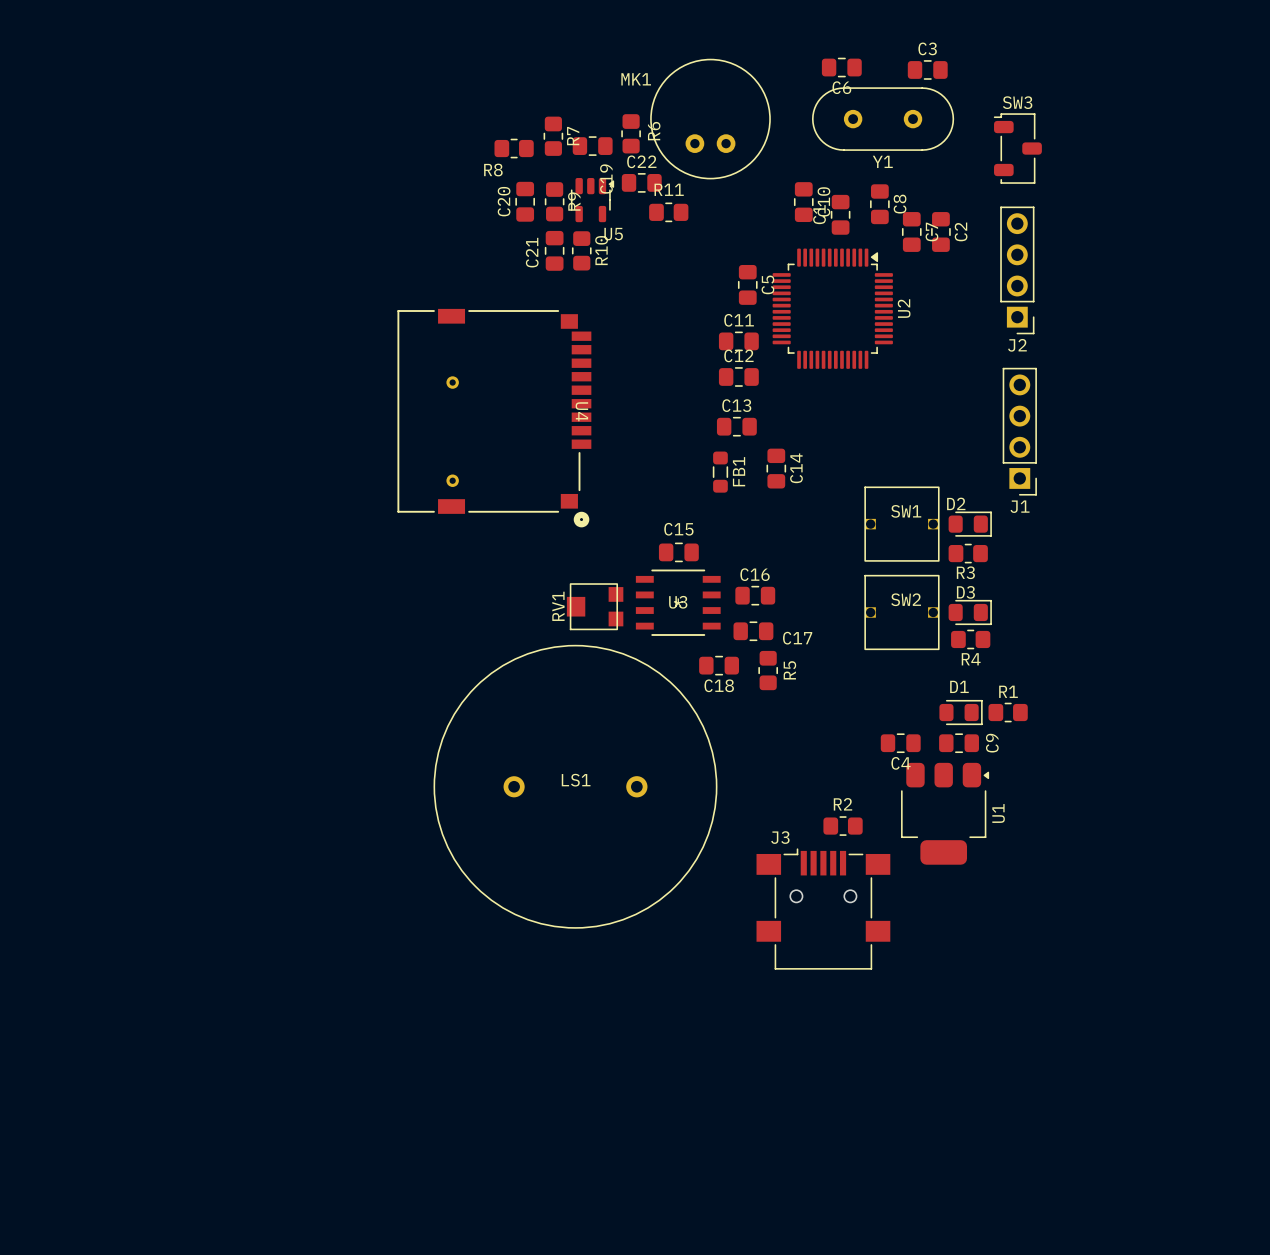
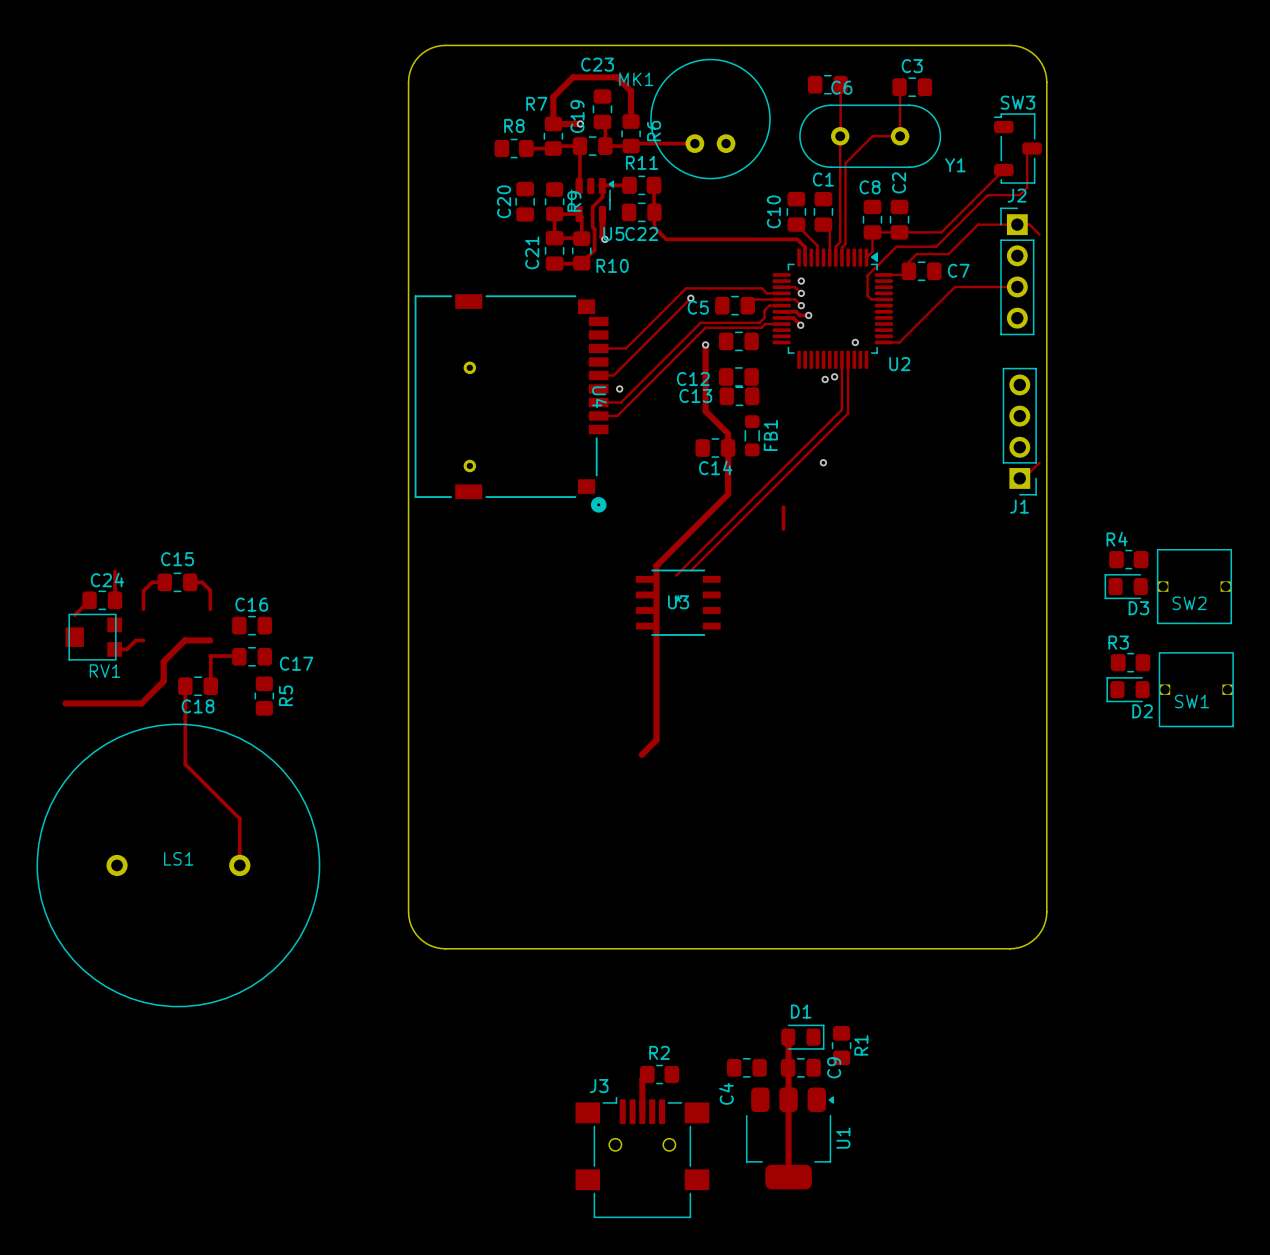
board edge: none -> (445, 45) (1009, 45) (1028, 50) (1041, 63) (1046, 82) (1046, 911) (1041, 930) (1028, 943) (1009, 948) (445, 948) (426, 943) (413, 930) (408, 911) (408, 82) (411, 68) (419, 56) (431, 48) (445, 45)
C6 position: (841, 67) -> (827, 84)
C3 position: (927, 69) -> (912, 87)
track: none -> (840, 84) (840, 242) (835, 246) (835, 257)
track: none -> (899, 87) (900, 136) (872, 136) (845, 163) (845, 243) (841, 247) (841, 257)
C23: none -> (602, 109)
Y1 position: (883, 119) -> (870, 136)
track: none -> (602, 121) (605, 124) (605, 146) (631, 146) (633, 143) (694, 143)
track: none -> (631, 121) (631, 91) (617, 77) (573, 77) (553, 96) (553, 123) (580, 123)
via: none -> (580, 123)
R7 name rotation: 0° (573, 136) -> 90° clockwise (536, 103)
R7 name position: R7 (573, 136) -> R7 (536, 103)
track: none -> (526, 148) (579, 146) (579, 186)
track: none -> (1027, 153) (1027, 187) (1019, 195) (987, 195) (936, 246) (896, 246) (867, 275) (867, 295) (871, 299) (883, 299)
C22 name position: C22 (641, 161) -> C22 (641, 233)
Y1 name position: Y1 (882, 161) -> Y1 (955, 165)
R8 name position: R8 (493, 170) -> R8 (514, 125)
track: none -> (998, 174) (941, 232) (872, 232) (872, 251) (866, 257)
C19 name position: C19 (606, 179) -> C19 (577, 116)
C22 position: (641, 182) -> (641, 212)
track: none -> (629, 185) (602, 186) (602, 197) (592, 207) (594, 250) (581, 263) (554, 263)
track: none -> (654, 185) (654, 227) (666, 239) (797, 239) (805, 247) (805, 257)
C10 name position: C10 (823, 201) -> C10 (773, 211)
C10 position: (803, 202) -> (796, 211)
C8 position: (879, 204) -> (872, 219)
C8 name rotation: 0° (900, 204) -> 90° clockwise (870, 187)
C8 name position: C8 (900, 204) -> C8 (870, 187)
R11 position: (668, 212) -> (641, 185)
track: none -> (554, 214) (554, 238) (581, 238) (581, 216) (579, 214) (554, 214)
track: none -> (602, 214) (602, 236) (604, 239) (604, 236)
C1 name rotation: 0° (819, 214) -> 90° clockwise (823, 179)
C1 name position: C1 (819, 214) -> C1 (823, 179)
C1 position: (840, 214) -> (823, 211)
track: none -> (801, 224) (796, 224) (817, 245) (817, 257)
track: none -> (823, 224) (829, 230) (829, 257)
C7 rotation: 0° (911, 231) -> 90° clockwise (921, 271)
C7 position: (911, 231) -> (921, 271)
C2 position: (940, 231) -> (899, 219)
C2 name position: C2 (961, 231) -> C2 (899, 182)
track: none -> (1039, 234) (1029, 224) (978, 224) (948, 254) (916, 254) (908, 261) (908, 271) (905, 274) (883, 274)
via: none -> (604, 239)
R10 name rotation: 0° (601, 250) -> 90° clockwise (612, 265)
J2 rotation: 0° (1017, 270) -> 180° (1017, 271)
via: none -> (801, 281)
C5 rotation: 0° (747, 284) -> 90° clockwise (735, 305)
C5 position: (747, 284) -> (735, 305)
C5 name position: C5 (767, 284) -> C5 (698, 307)
track: none -> (1017, 286) (954, 286) (899, 342) (883, 342)
track: none -> (781, 287) (795, 287) (801, 293)
track: none -> (781, 293) (766, 293) (762, 288) (685, 288) (625, 348) (598, 348)
via: none -> (801, 293)
track: none -> (690, 298) (613, 375) (598, 375)
via: none -> (690, 298)
track: none -> (747, 298) (795, 299) (801, 305)
track: none -> (781, 305) (769, 305) (764, 310) (764, 317) (759, 322) (700, 322) (621, 402) (598, 402)
via: none -> (801, 305)
U2 name rotation: 0° (904, 308) -> 90° clockwise (899, 364)
U2 name position: U2 (904, 308) -> U2 (899, 364)
track: none -> (781, 311) (796, 311) (799, 315) (808, 315)
via: none -> (808, 315)
track: none -> (781, 317) (793, 317) (800, 325)
C11 name: C11 (739, 320) -> none
track: none -> (781, 324) (765, 324) (761, 327) (705, 327) (617, 415) (598, 415)
via: none -> (800, 325)
via: none -> (855, 342)
track: none -> (705, 344) (705, 411) (728, 433) (728, 494) (656, 565) (656, 740) (641, 754)
via: none -> (705, 344)
C12 name position: C12 (738, 355) -> C12 (693, 378)
track: none -> (841, 359) (841, 409) (676, 575)
track: none -> (848, 359) (848, 413) (690, 570)
via: none -> (834, 376)
via: none -> (825, 379)
via: none -> (619, 388)
C13 name position: C13 (736, 405) -> C13 (695, 396)
U4 position: (494, 418) -> (511, 403)
C13 position: (736, 426) -> (739, 396)
via: none -> (823, 462)
track: none -> (1039, 462) (1023, 478) (1017, 478)
C14 rotation: 0° (776, 468) -> 90° clockwise (715, 448)
C14 position: (776, 468) -> (715, 448)
FB1 position: (720, 472) -> (752, 435)
track: none -> (783, 507) (783, 529)
SW1 name position: SW1 (906, 511) -> SW1 (1192, 701)
SW1 position: (901, 524) -> (1196, 689)
D2 rotation: 0° (970, 524) -> 180° (1128, 689)
D2 position: (970, 524) -> (1128, 689)
C15 position: (678, 552) -> (177, 582)
R3 position: (968, 553) -> (1130, 662)
track: none -> (115, 571) (115, 600)
R3 name position: R3 (965, 572) -> R3 (1118, 642)
track: none -> (164, 582) (152, 582) (143, 591) (143, 609)
track: none -> (190, 582) (202, 582) (210, 590) (210, 609)
C16 position: (755, 595) -> (252, 625)
SW2 name position: SW2 (906, 599) -> SW2 (1189, 603)
track: none -> (89, 600) (74, 615)
C24: none -> (102, 600)
RV1 name rotation: 0° (558, 606) -> 90° clockwise (105, 671)
RV1 name position: RV1 (558, 606) -> RV1 (105, 671)
RV1 position: (595, 606) -> (93, 637)
SW2 position: (901, 612) -> (1194, 586)
D3 rotation: 0° (970, 612) -> 180° (1126, 586)
D3 position: (970, 612) -> (1126, 586)
C17 position: (753, 631) -> (252, 656)
R4 position: (970, 639) -> (1128, 559)
track: none -> (143, 640) (135, 640) (126, 649) (114, 649)
track: none -> (210, 640) (184, 640) (163, 661) (163, 681) (141, 703) (65, 703)
track: none -> (239, 656) (210, 656) (210, 686)
R4 name position: R4 (971, 659) -> R4 (1117, 539)
C18 position: (719, 665) -> (198, 686)
R5 position: (768, 670) -> (264, 696)
track: none -> (185, 686) (185, 764) (239, 818) (239, 865)
D1 position: (961, 712) -> (802, 1037)
R1 rotation: 0° (1008, 712) -> 90° clockwise (841, 1045)
R1 position: (1008, 712) -> (841, 1045)
C4 position: (900, 743) -> (746, 1067)
C9 position: (959, 743) -> (800, 1067)
C4 name rotation: 0° (901, 763) -> 90° counterclockwise (726, 1093)
LS1 position: (575, 786) -> (178, 865)
U1 position: (945, 813) -> (790, 1138)
R2 position: (843, 826) -> (659, 1074)
J3 position: (823, 909) -> (642, 1157)
track: none -> (788, 1037) (788, 1177)
track: none -> (647, 1074) (642, 1079) (642, 1111)

